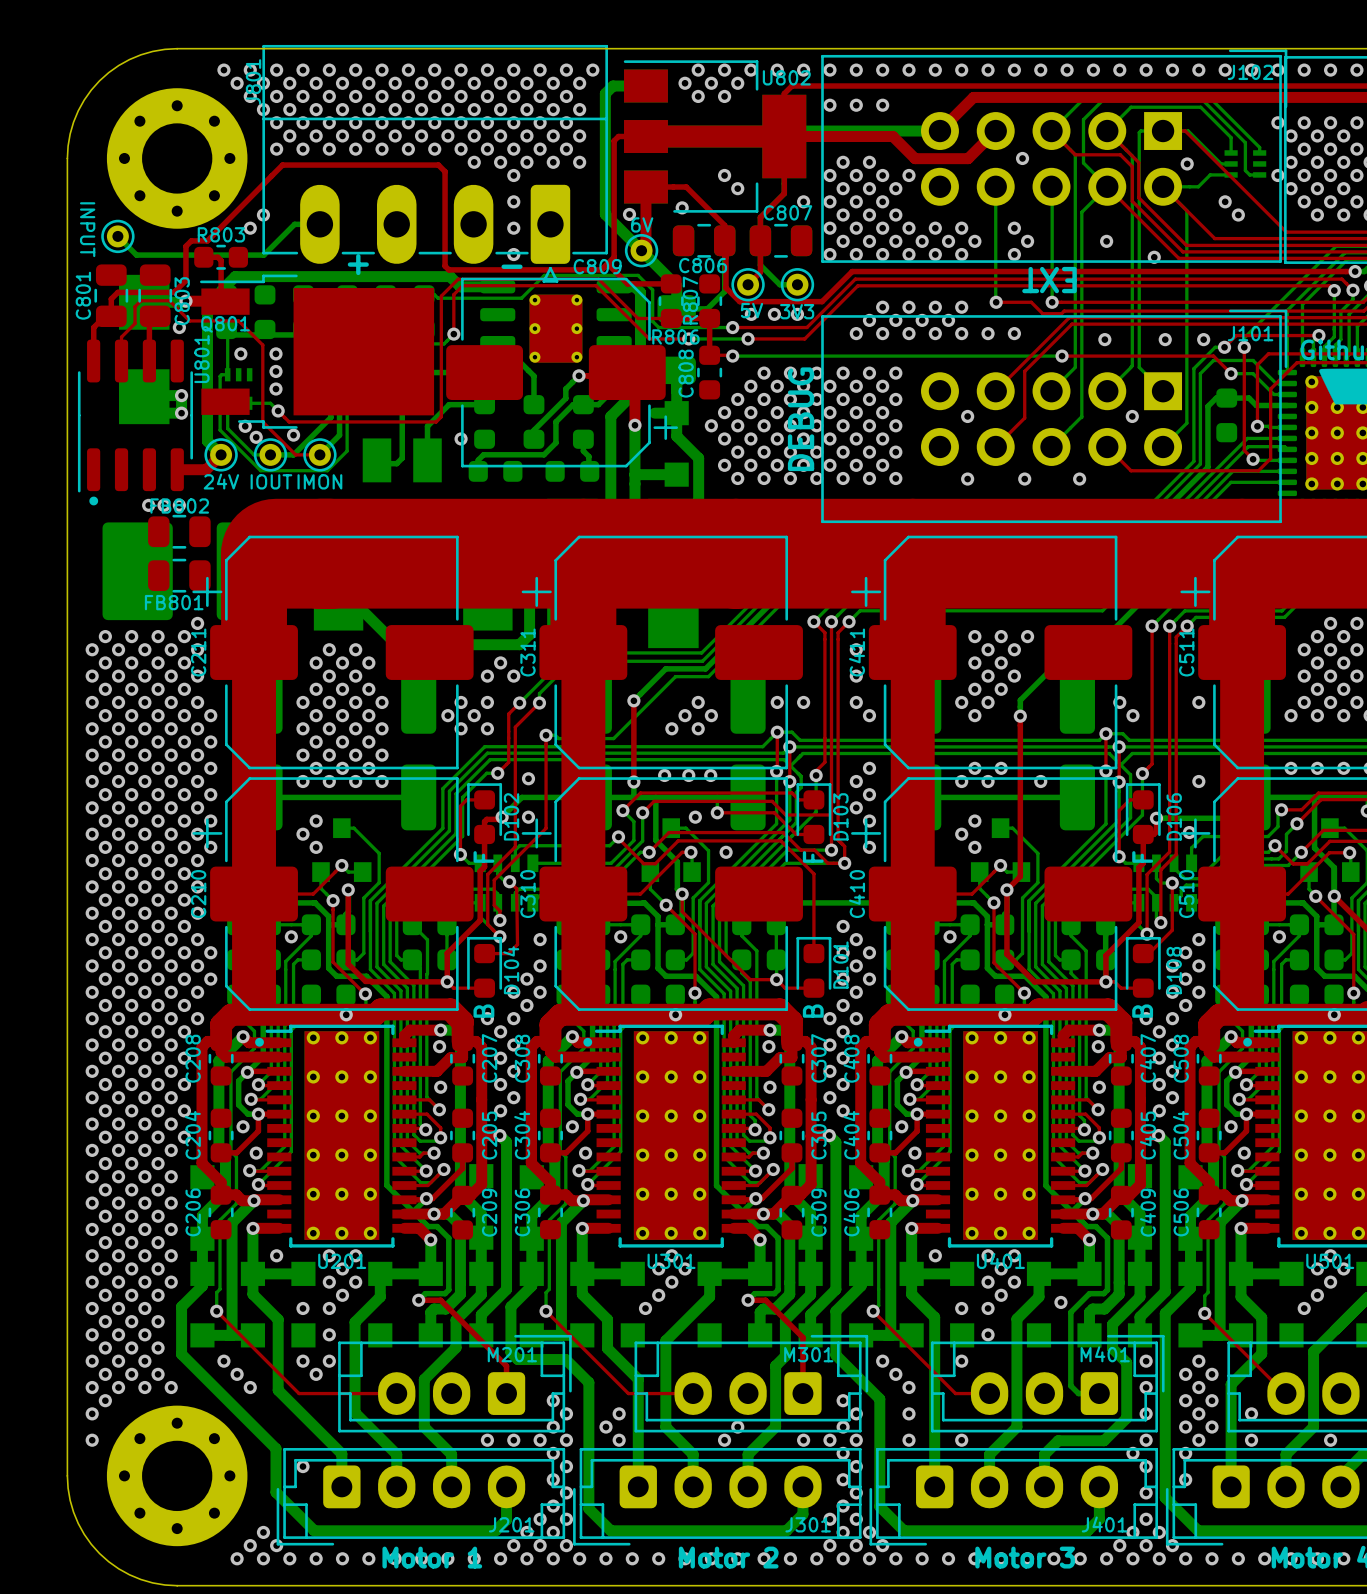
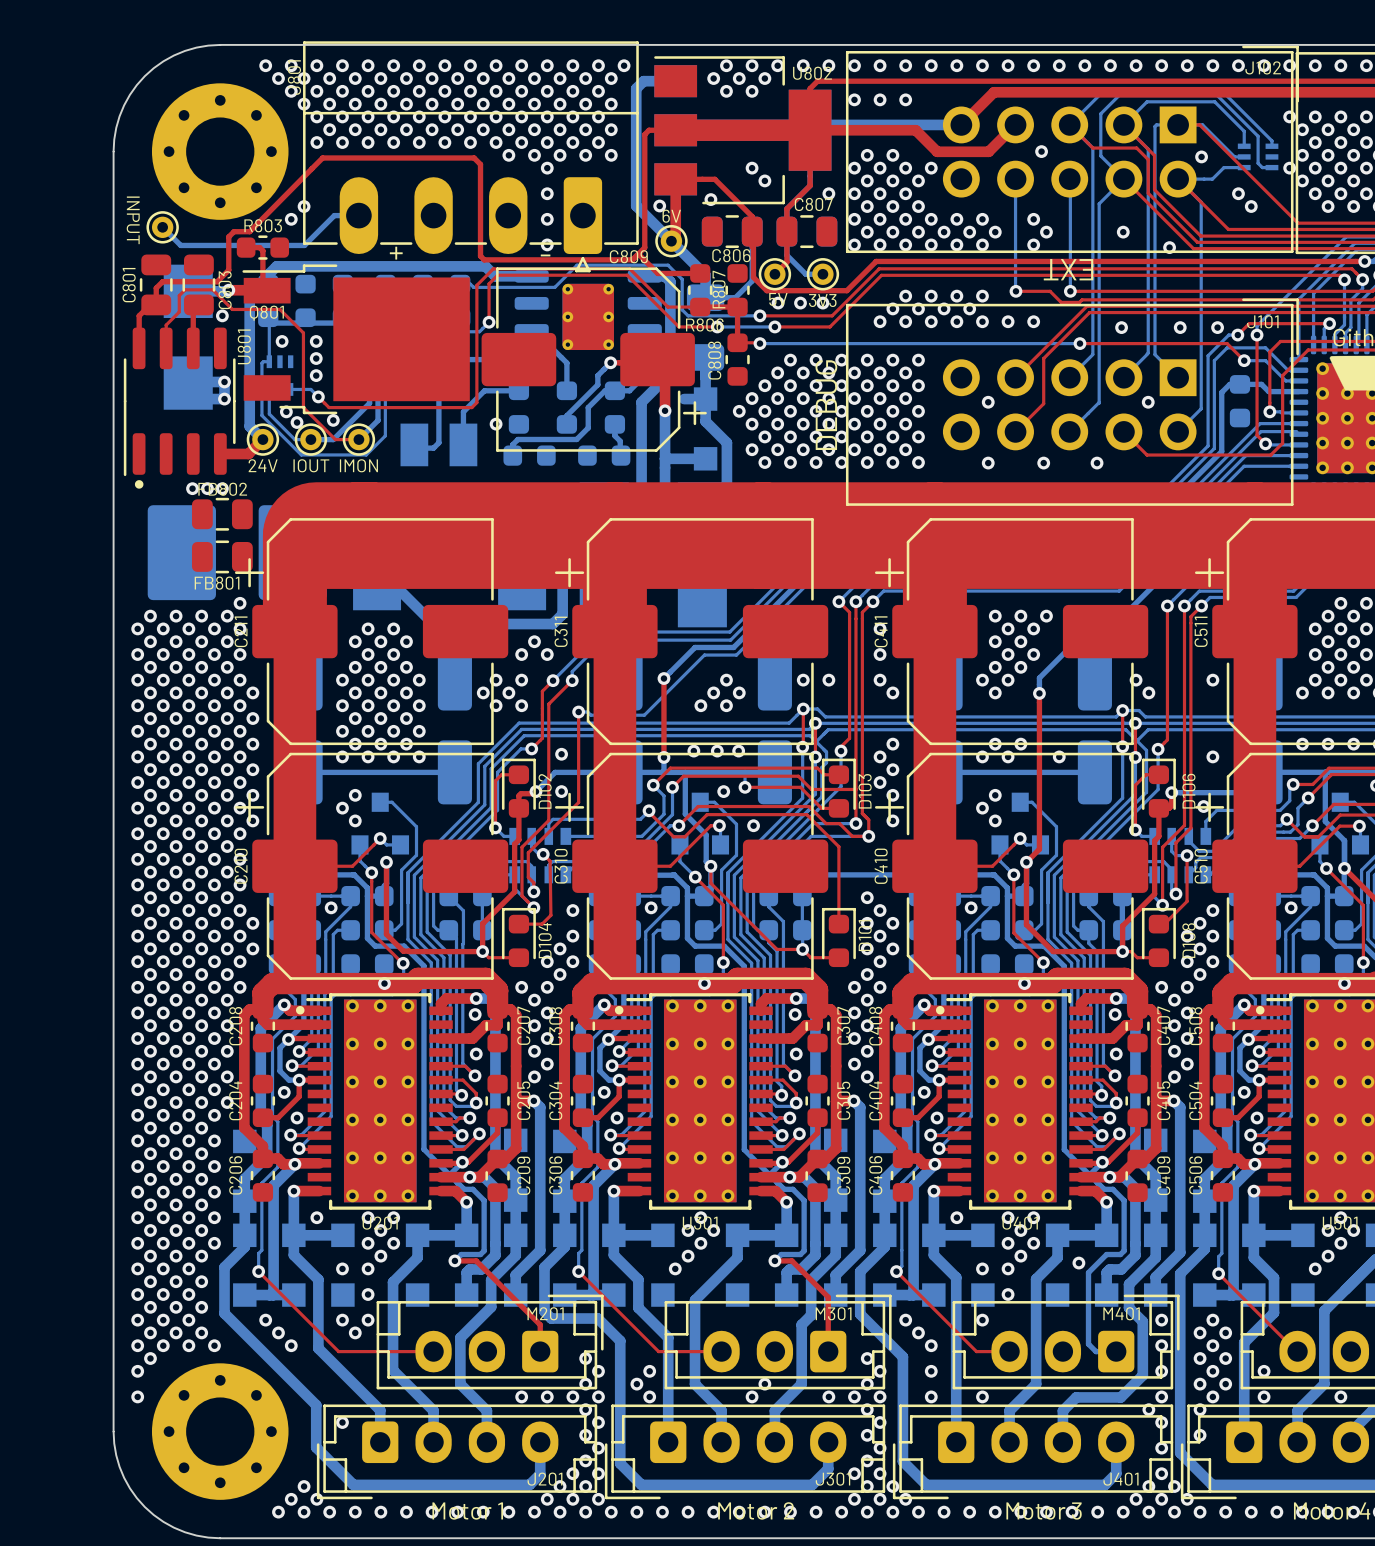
text: F (483, 856) -> none
text: F (813, 856) -> none
text: F (1142, 856) -> none
text: B (483, 1011) -> none
text: B (813, 1011) -> none
text: B (1142, 1011) -> none

